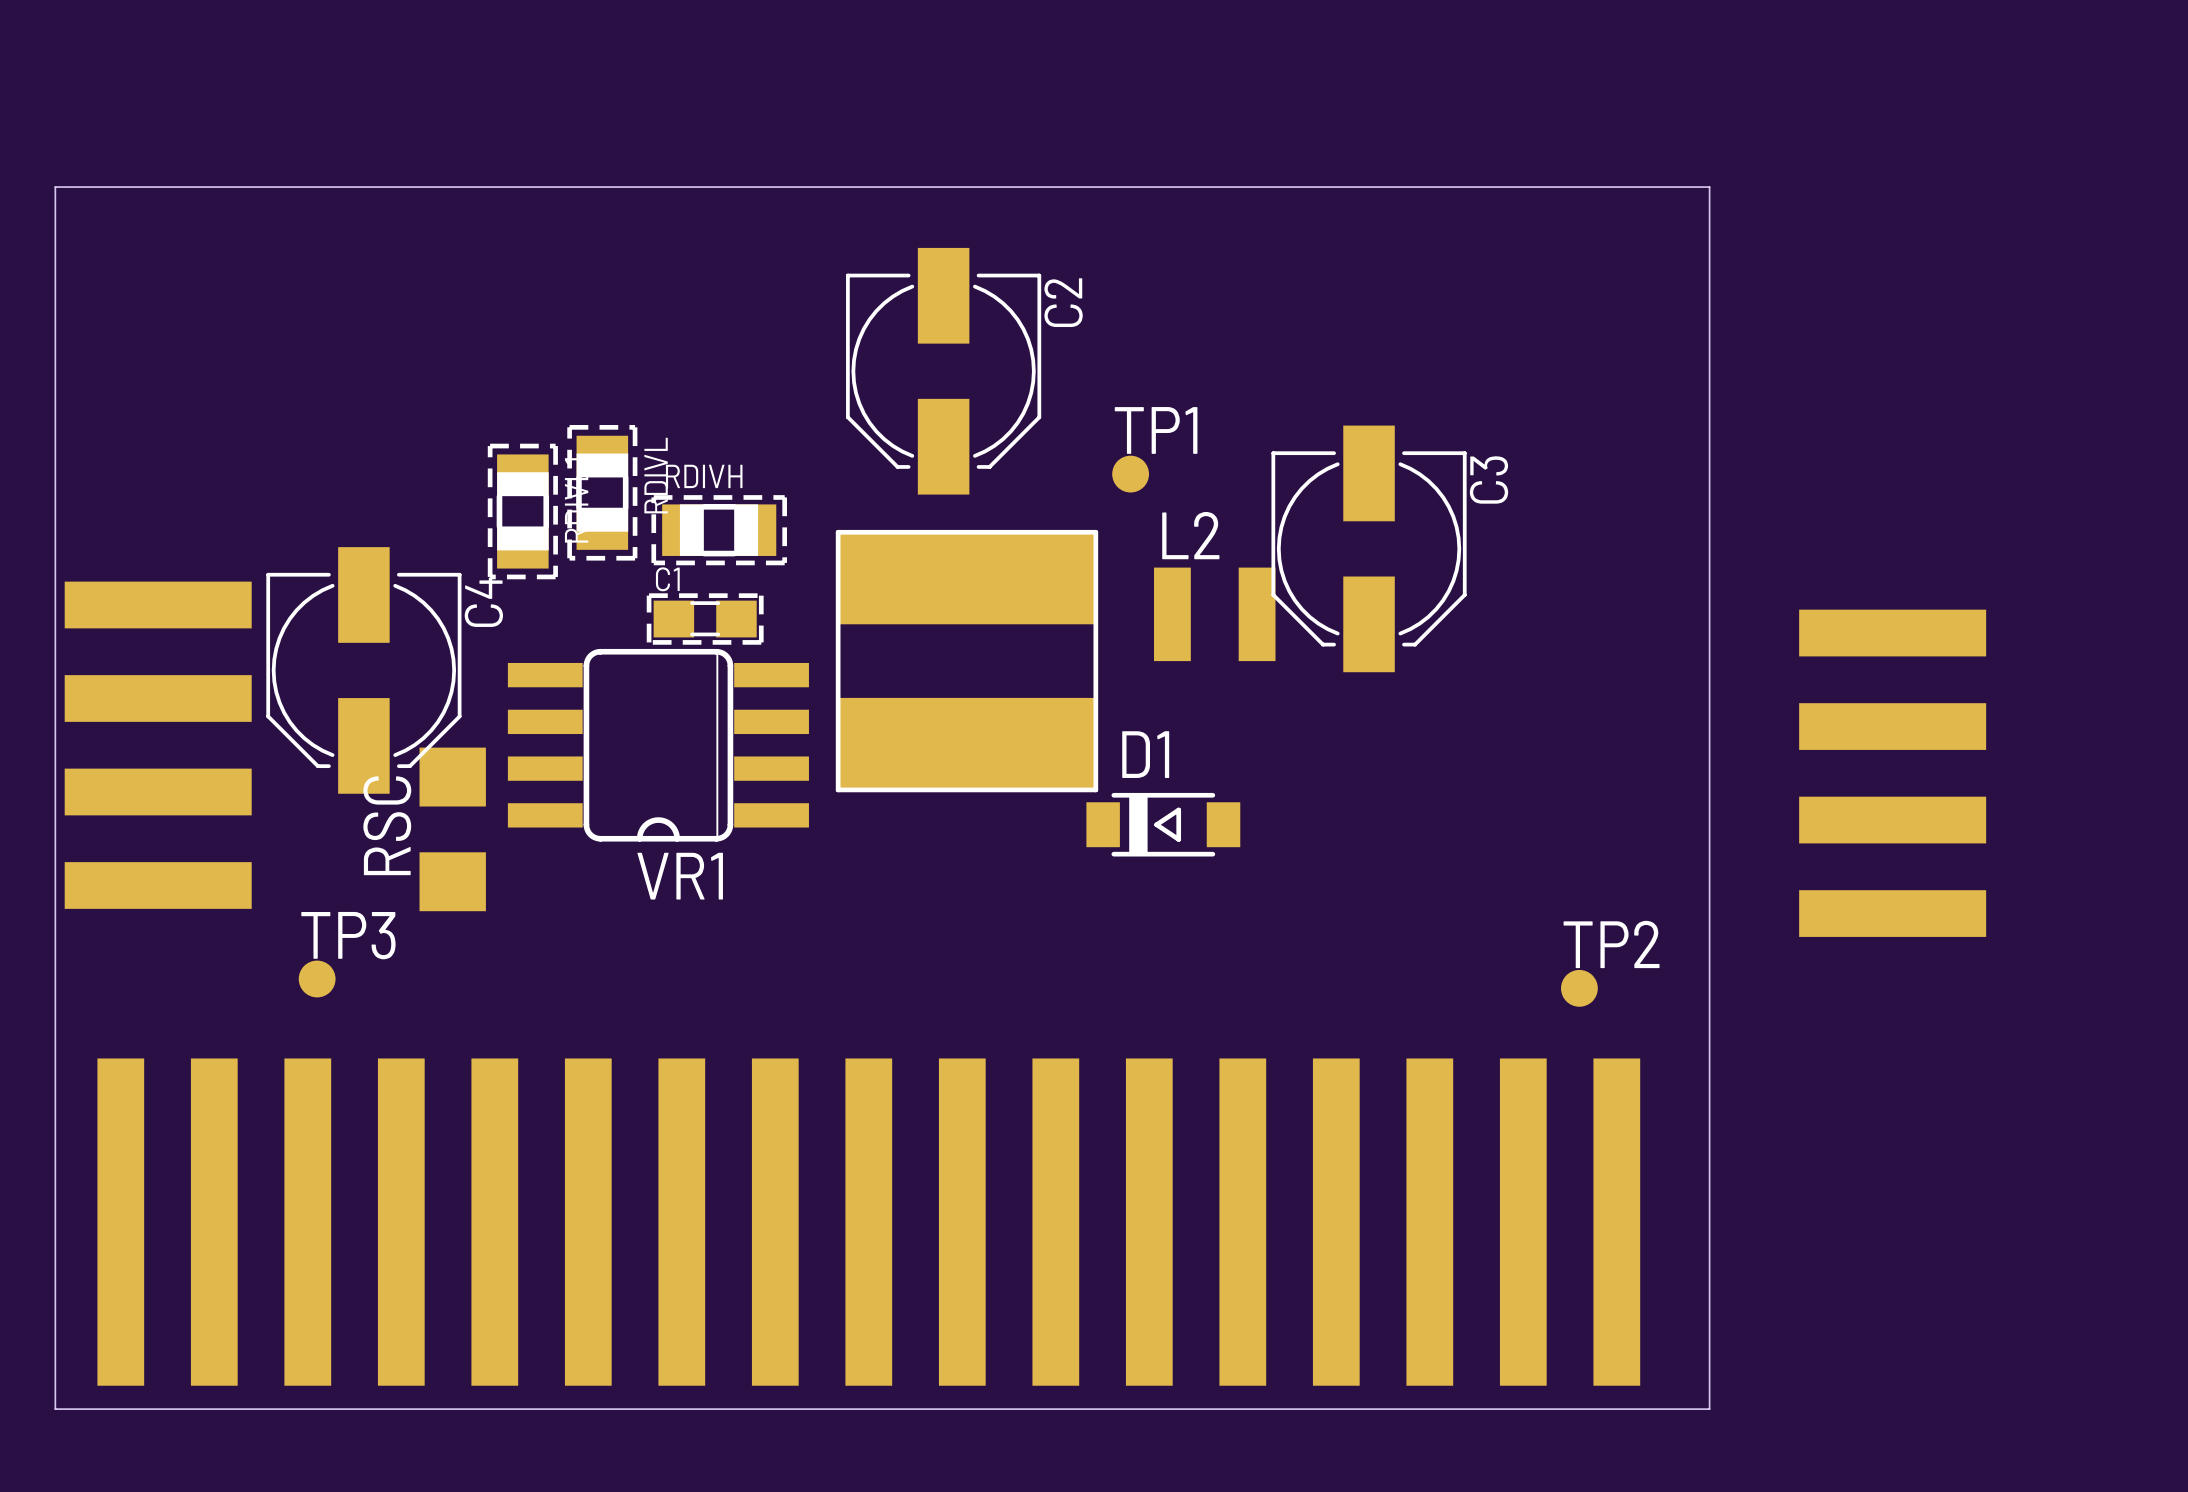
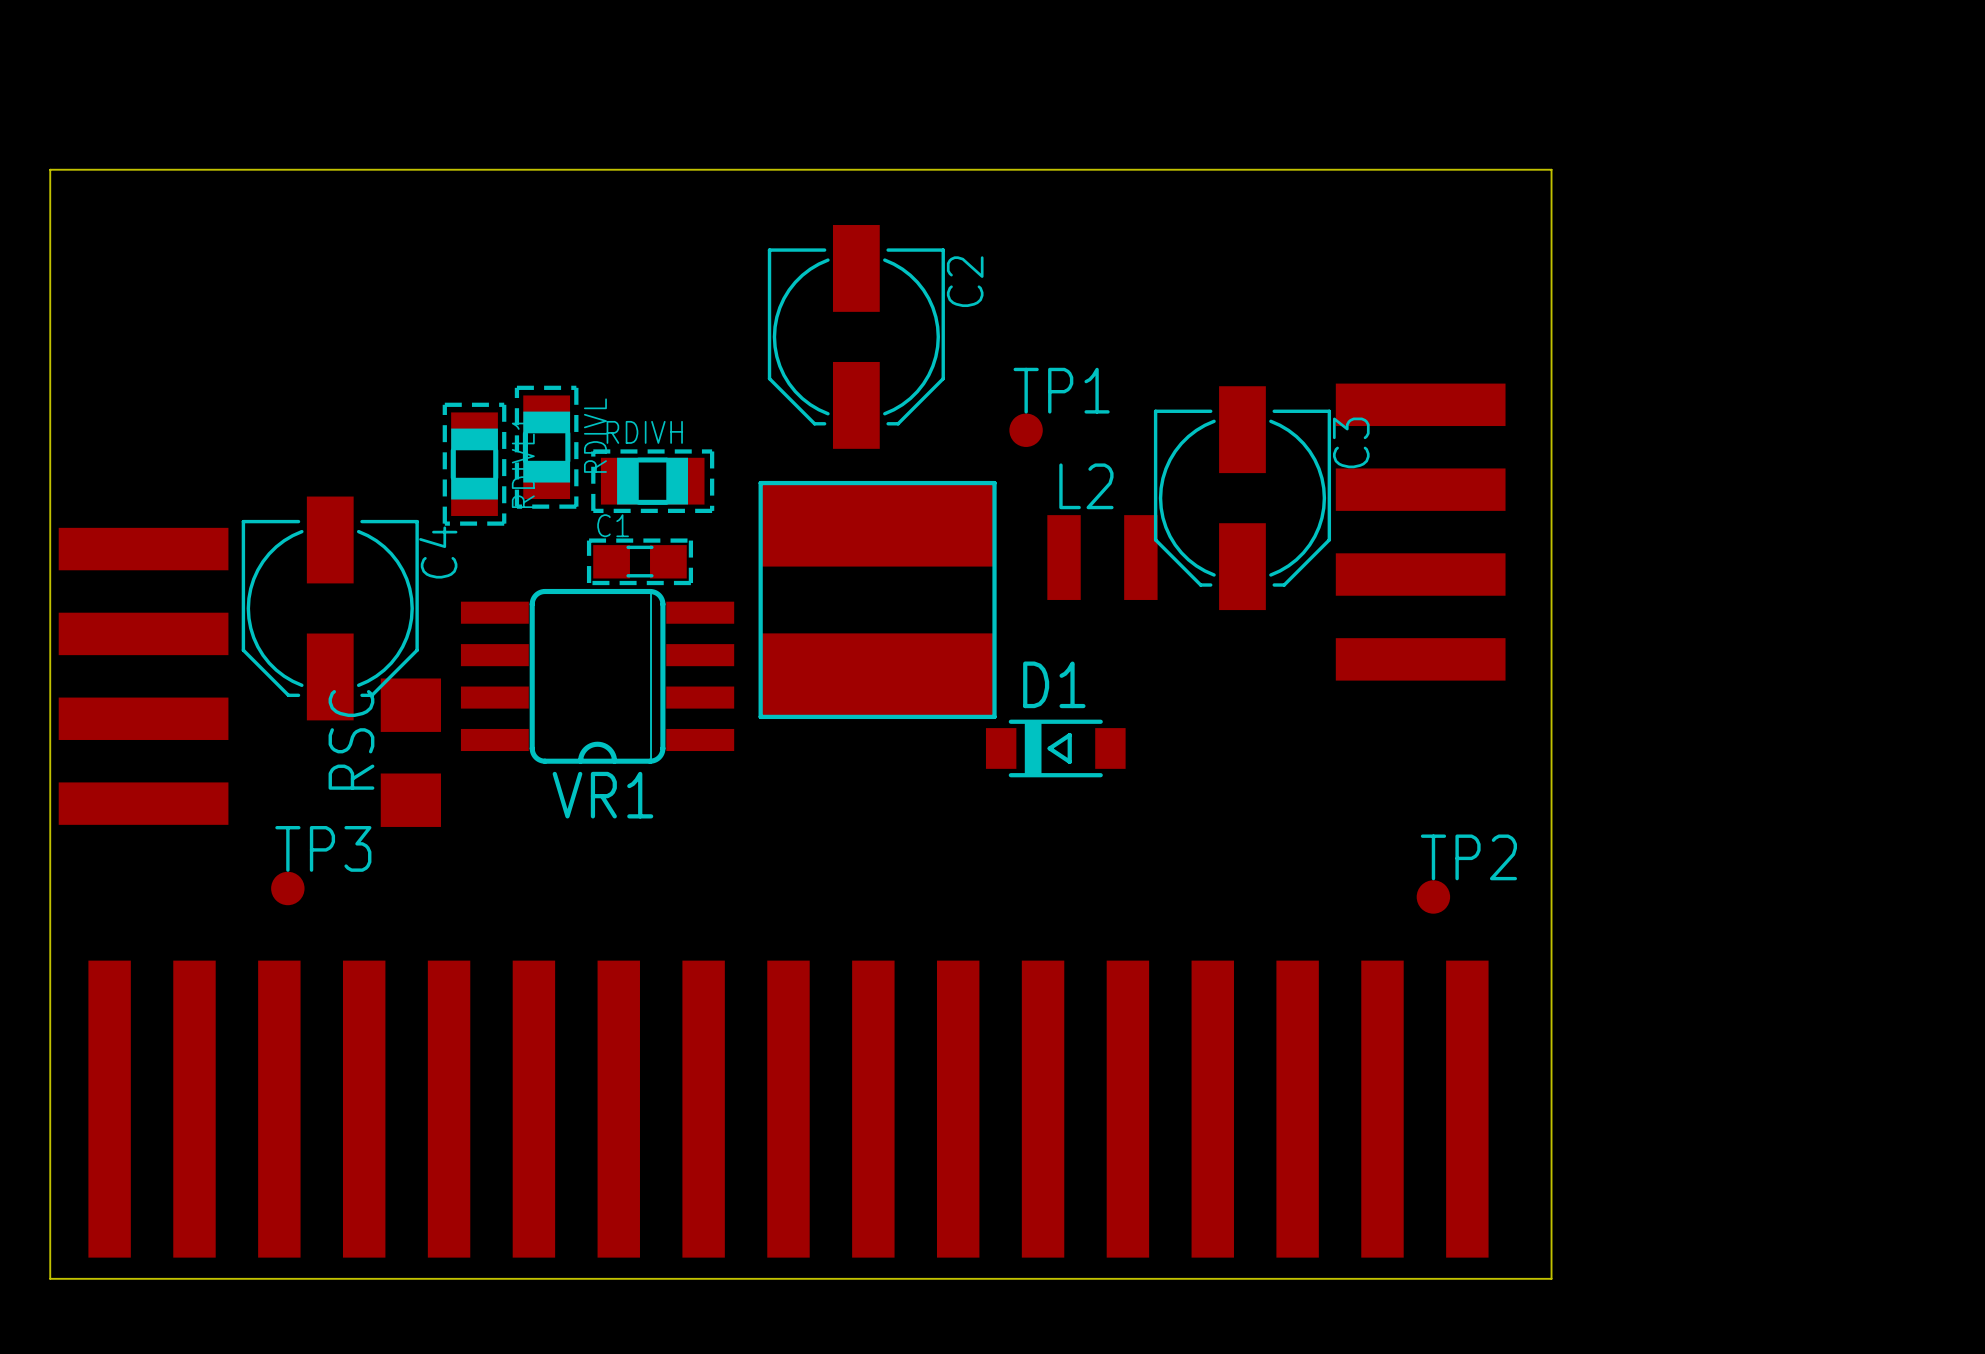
part position: (1892, 773) -> (1420, 532)

